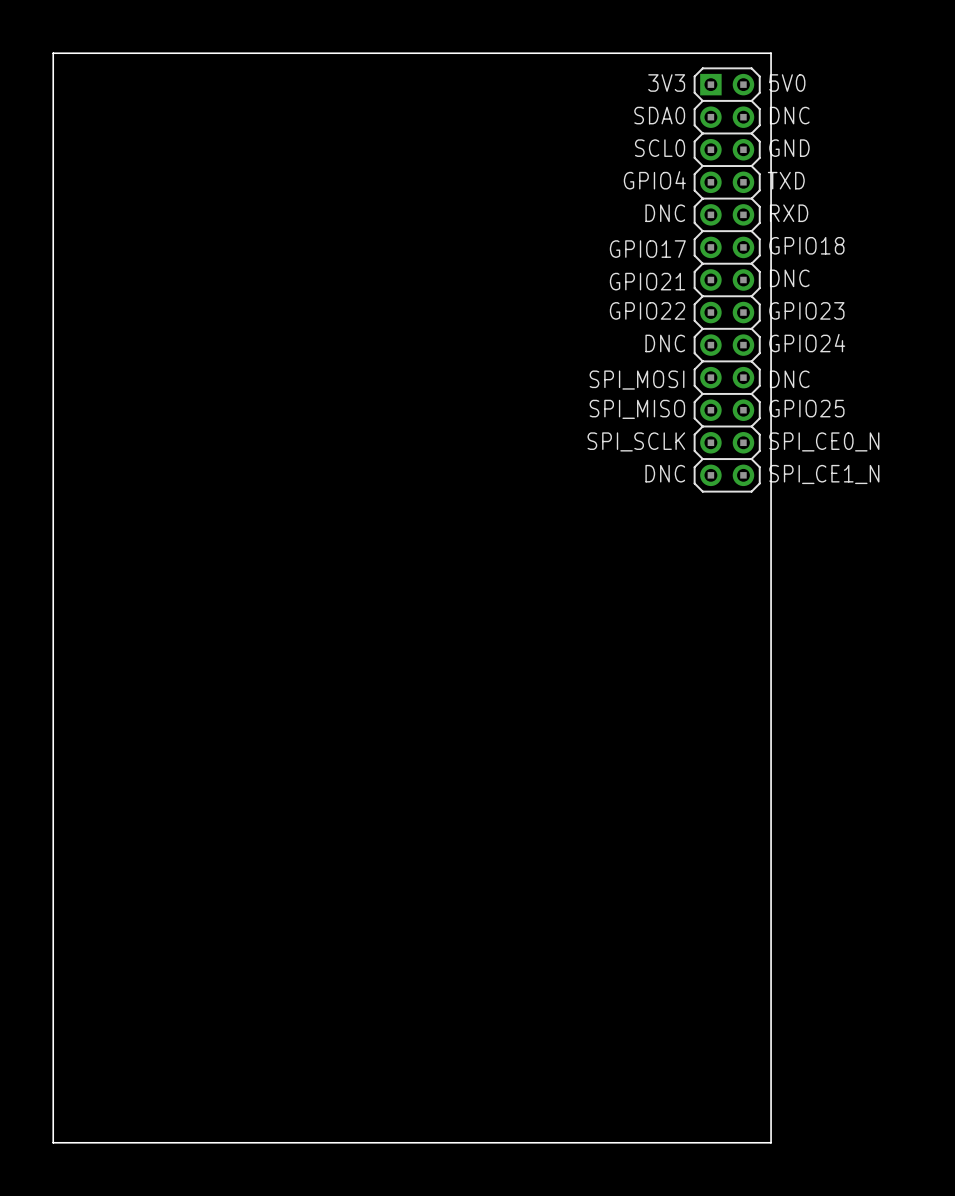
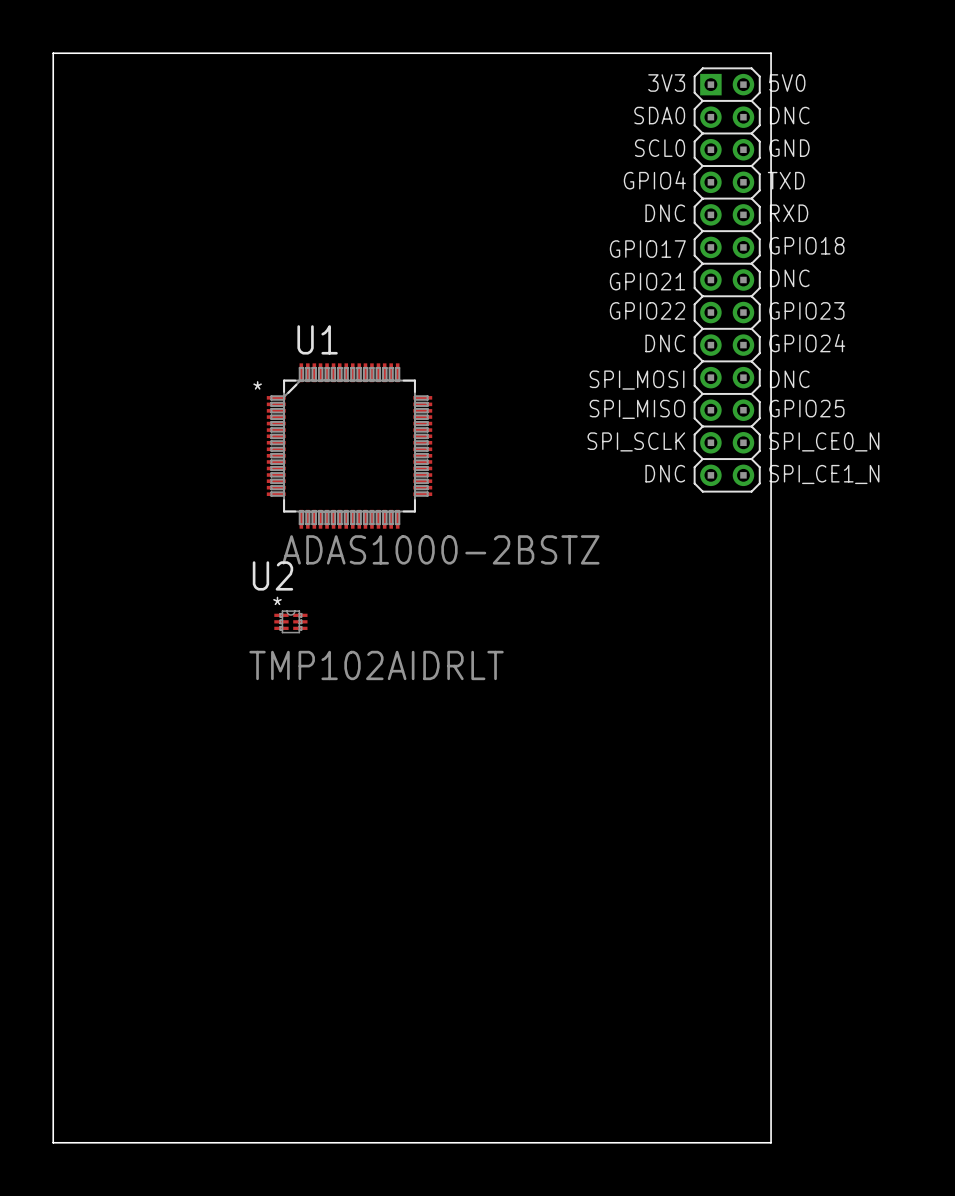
U1: none -> ADAS1000-2BSTZ (349, 446)
U2: none -> TMP102AIDRLT (290, 621)

